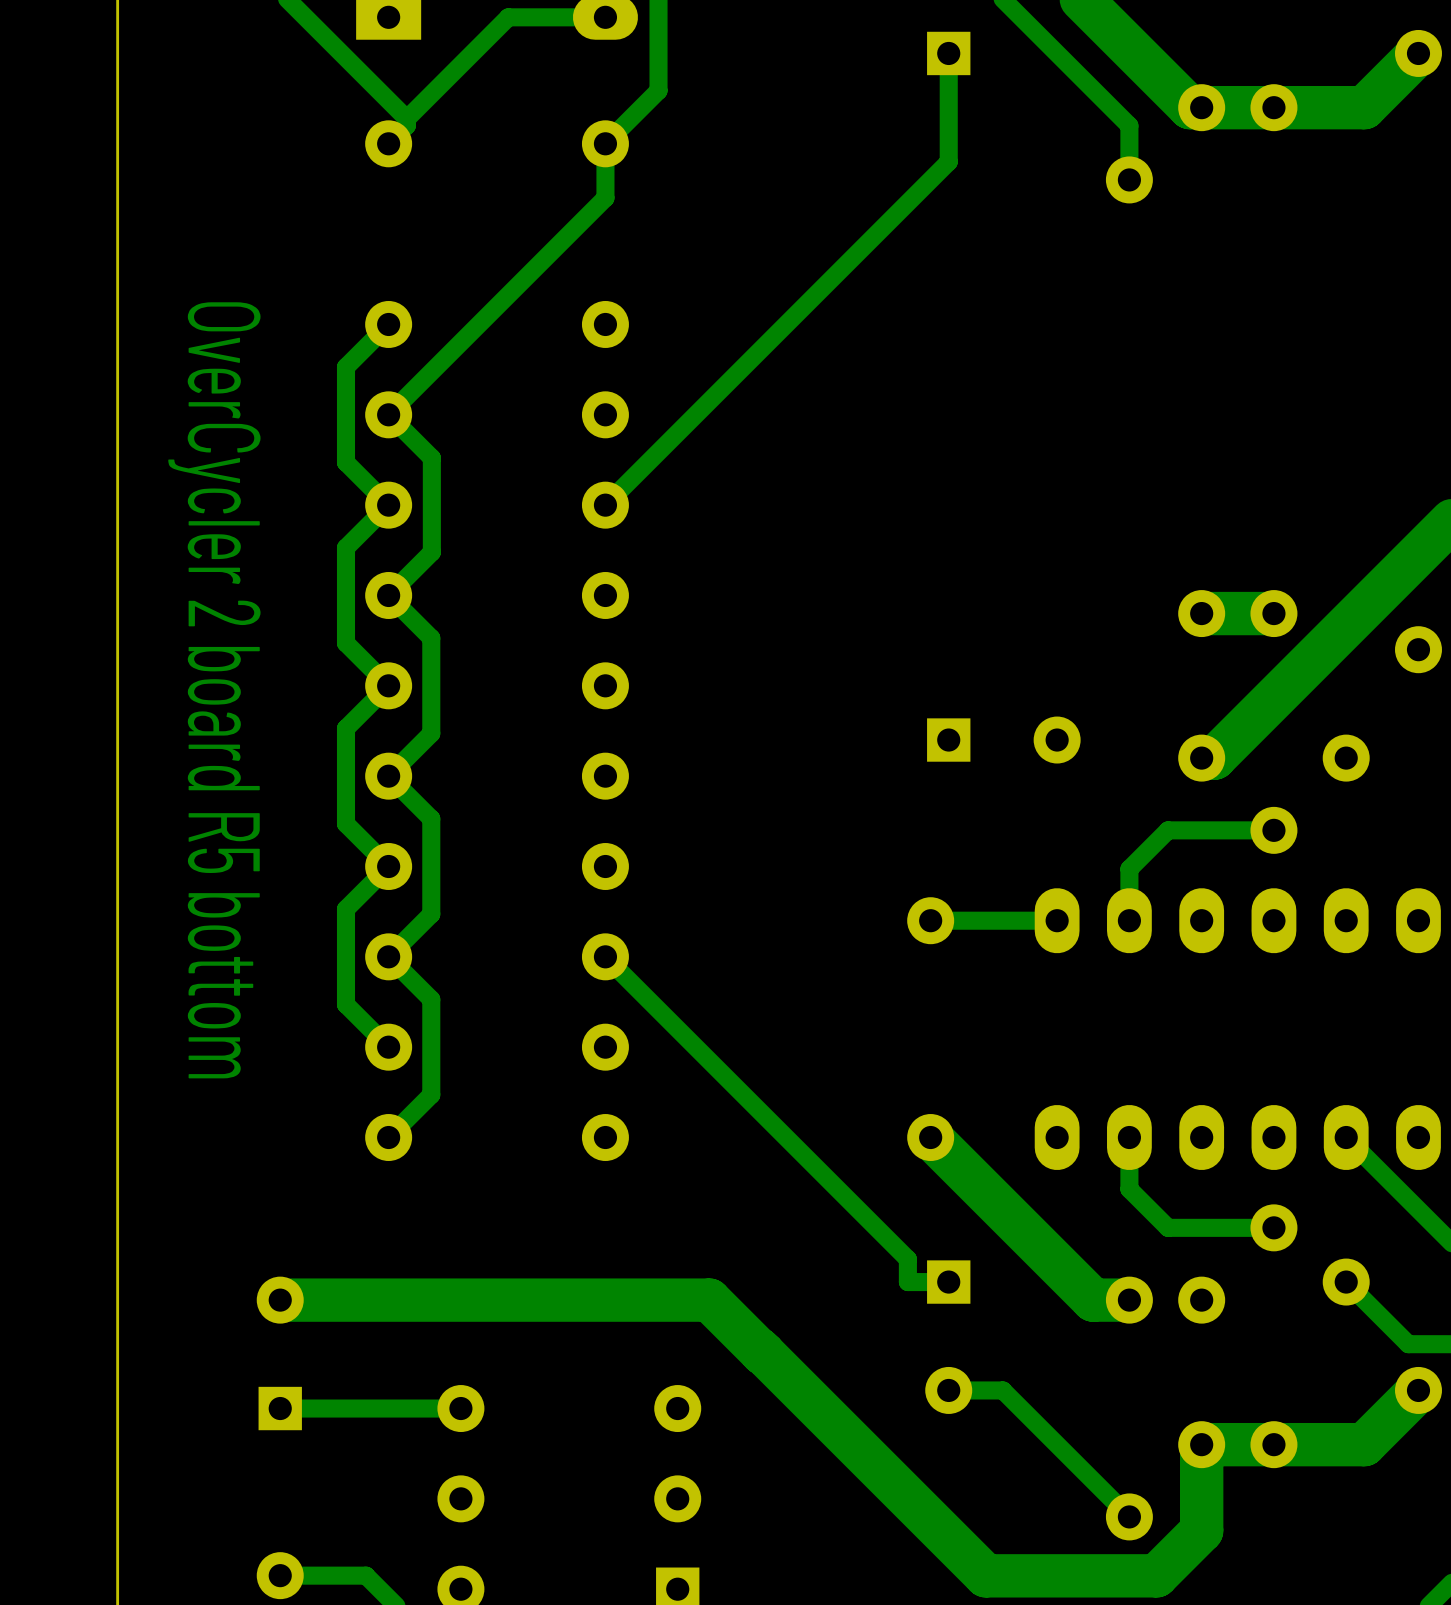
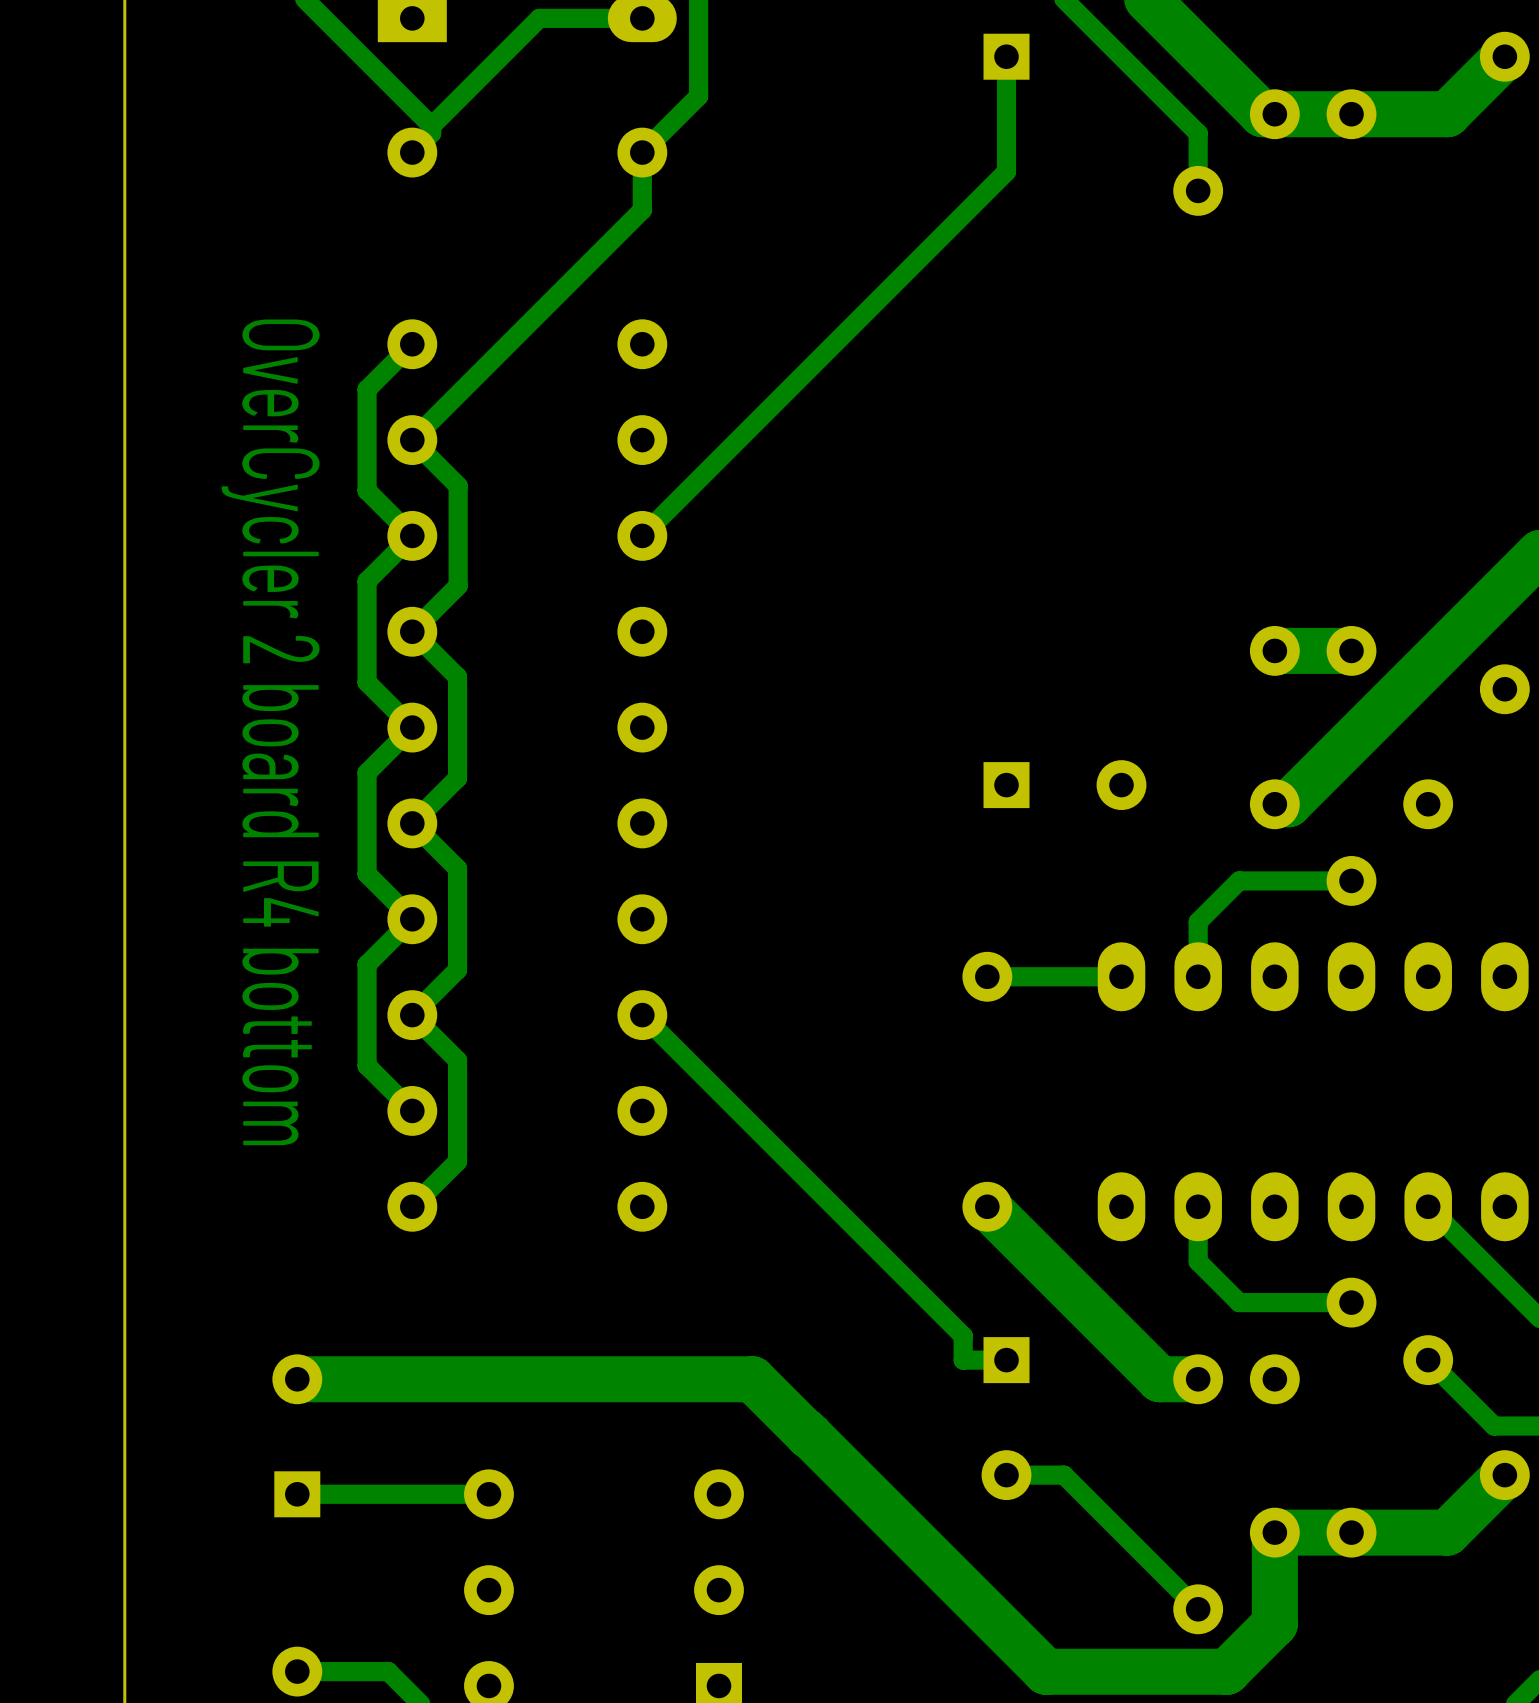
text: OverCycler 2 board R5 bottom (214, 690) -> OverCycler 2 board R4 bottom (270, 732)

